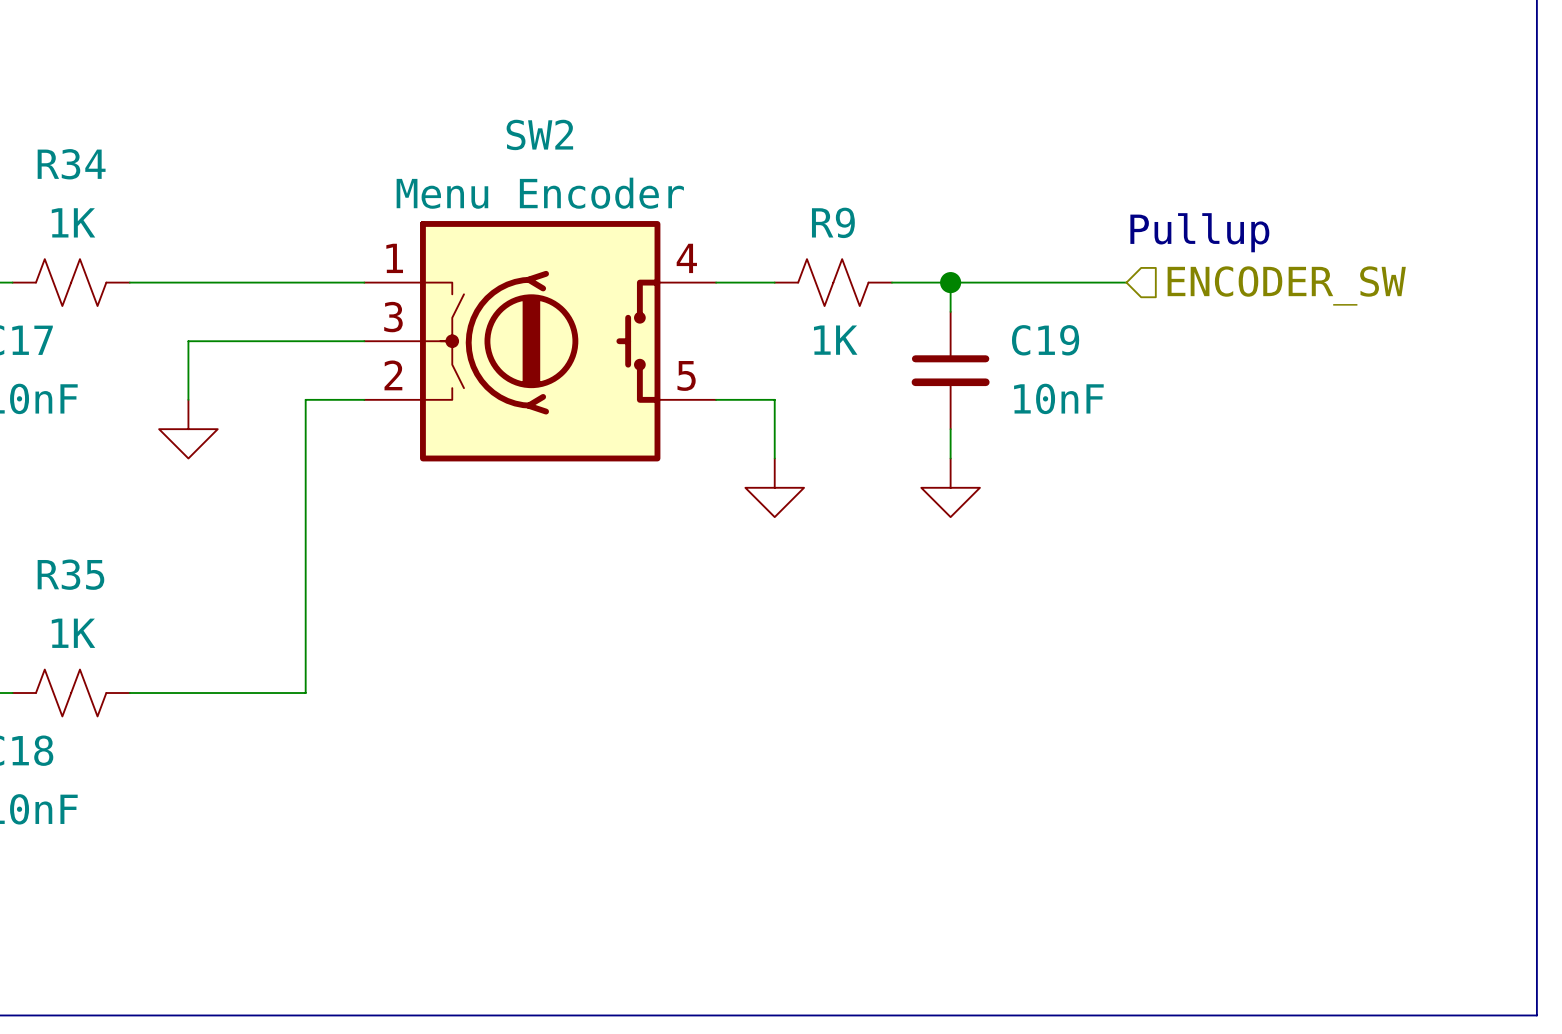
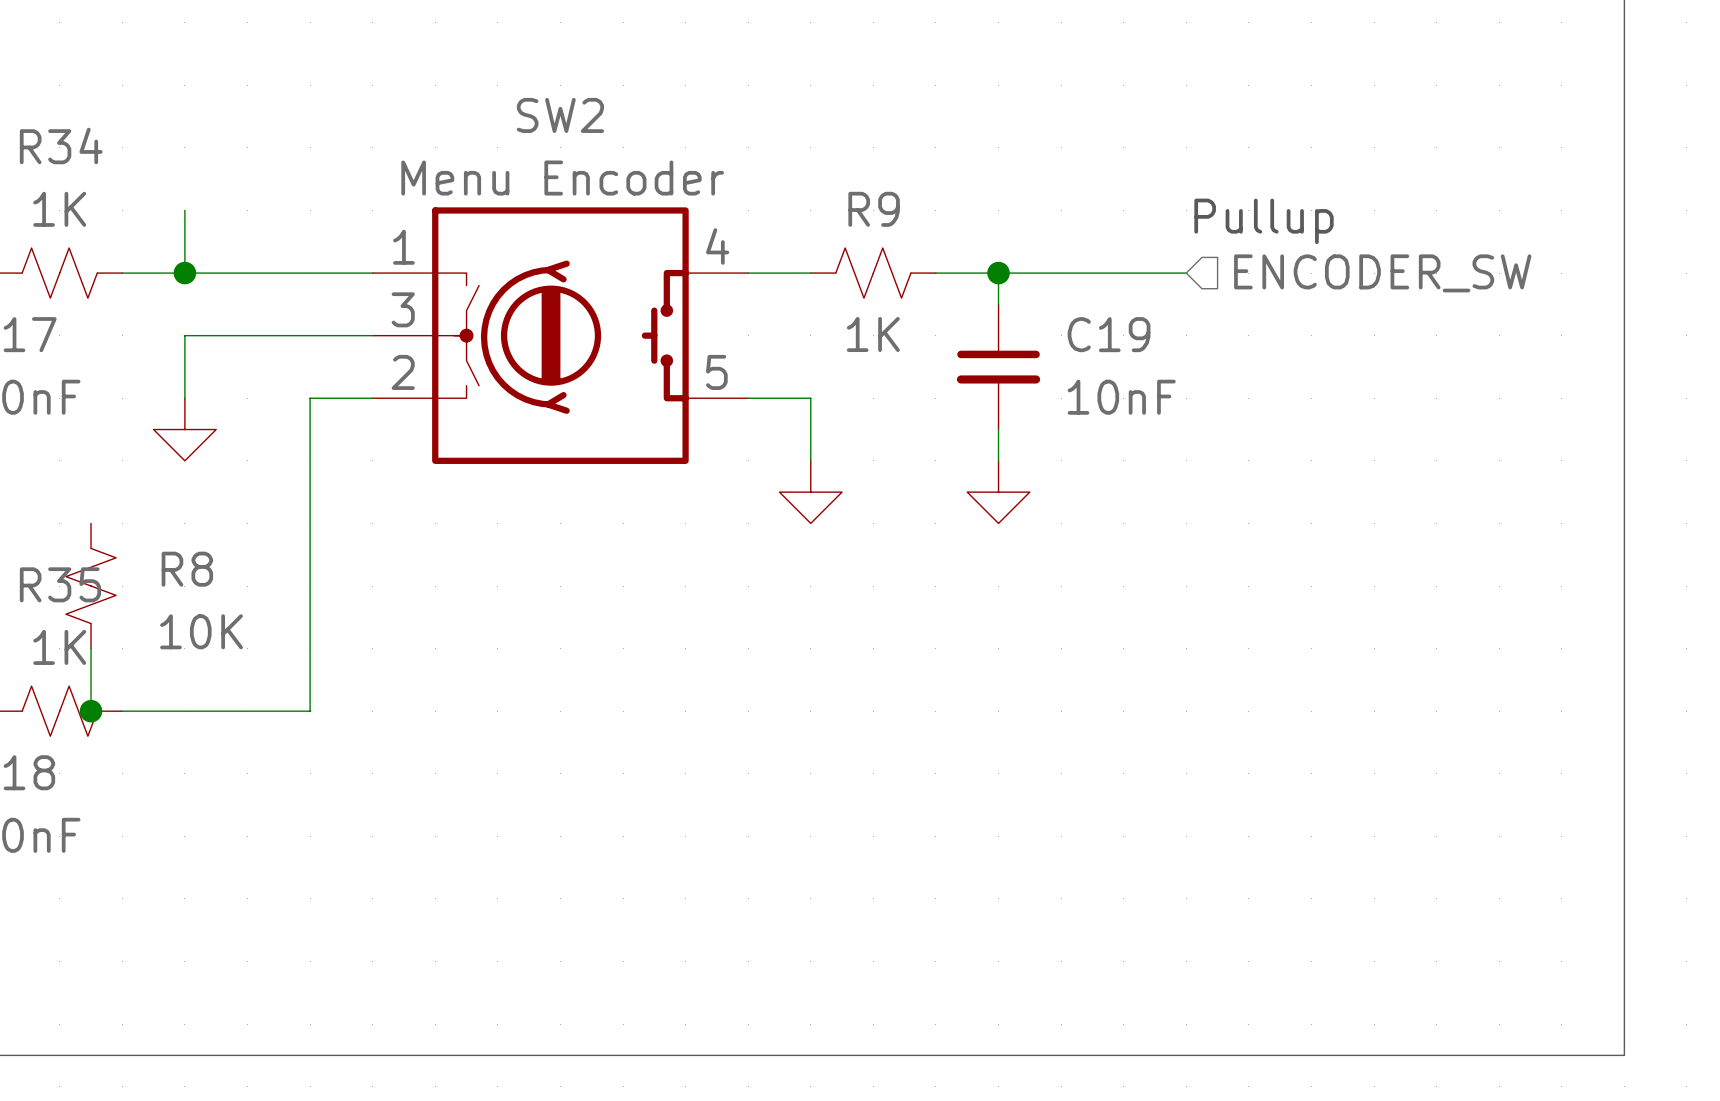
wire: none -> (184, 210) (184, 273)
junction: none -> (184, 273)
R8: none -> 10K (91, 586)
wire: none -> (91, 648) (91, 711)
junction: none -> (91, 711)

